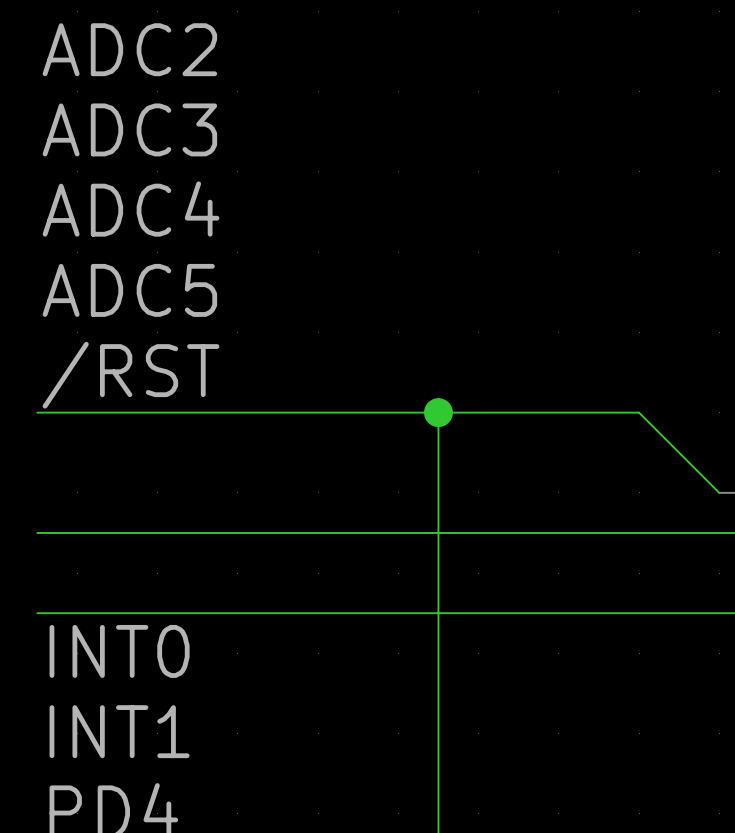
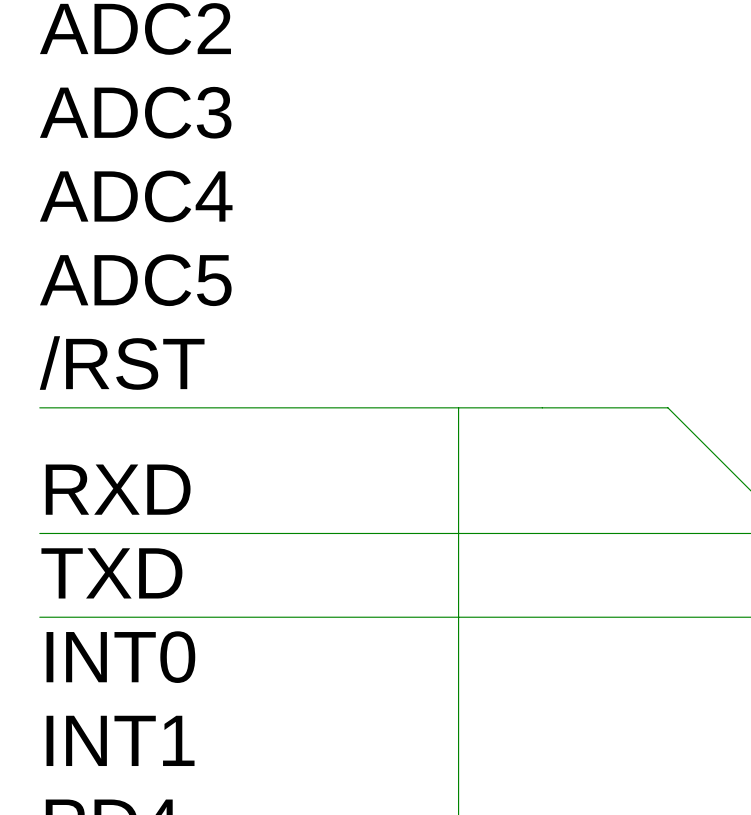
junction: (438, 412) -> none
label: none -> RXD (118, 489)
label: none -> TXD (111, 573)

